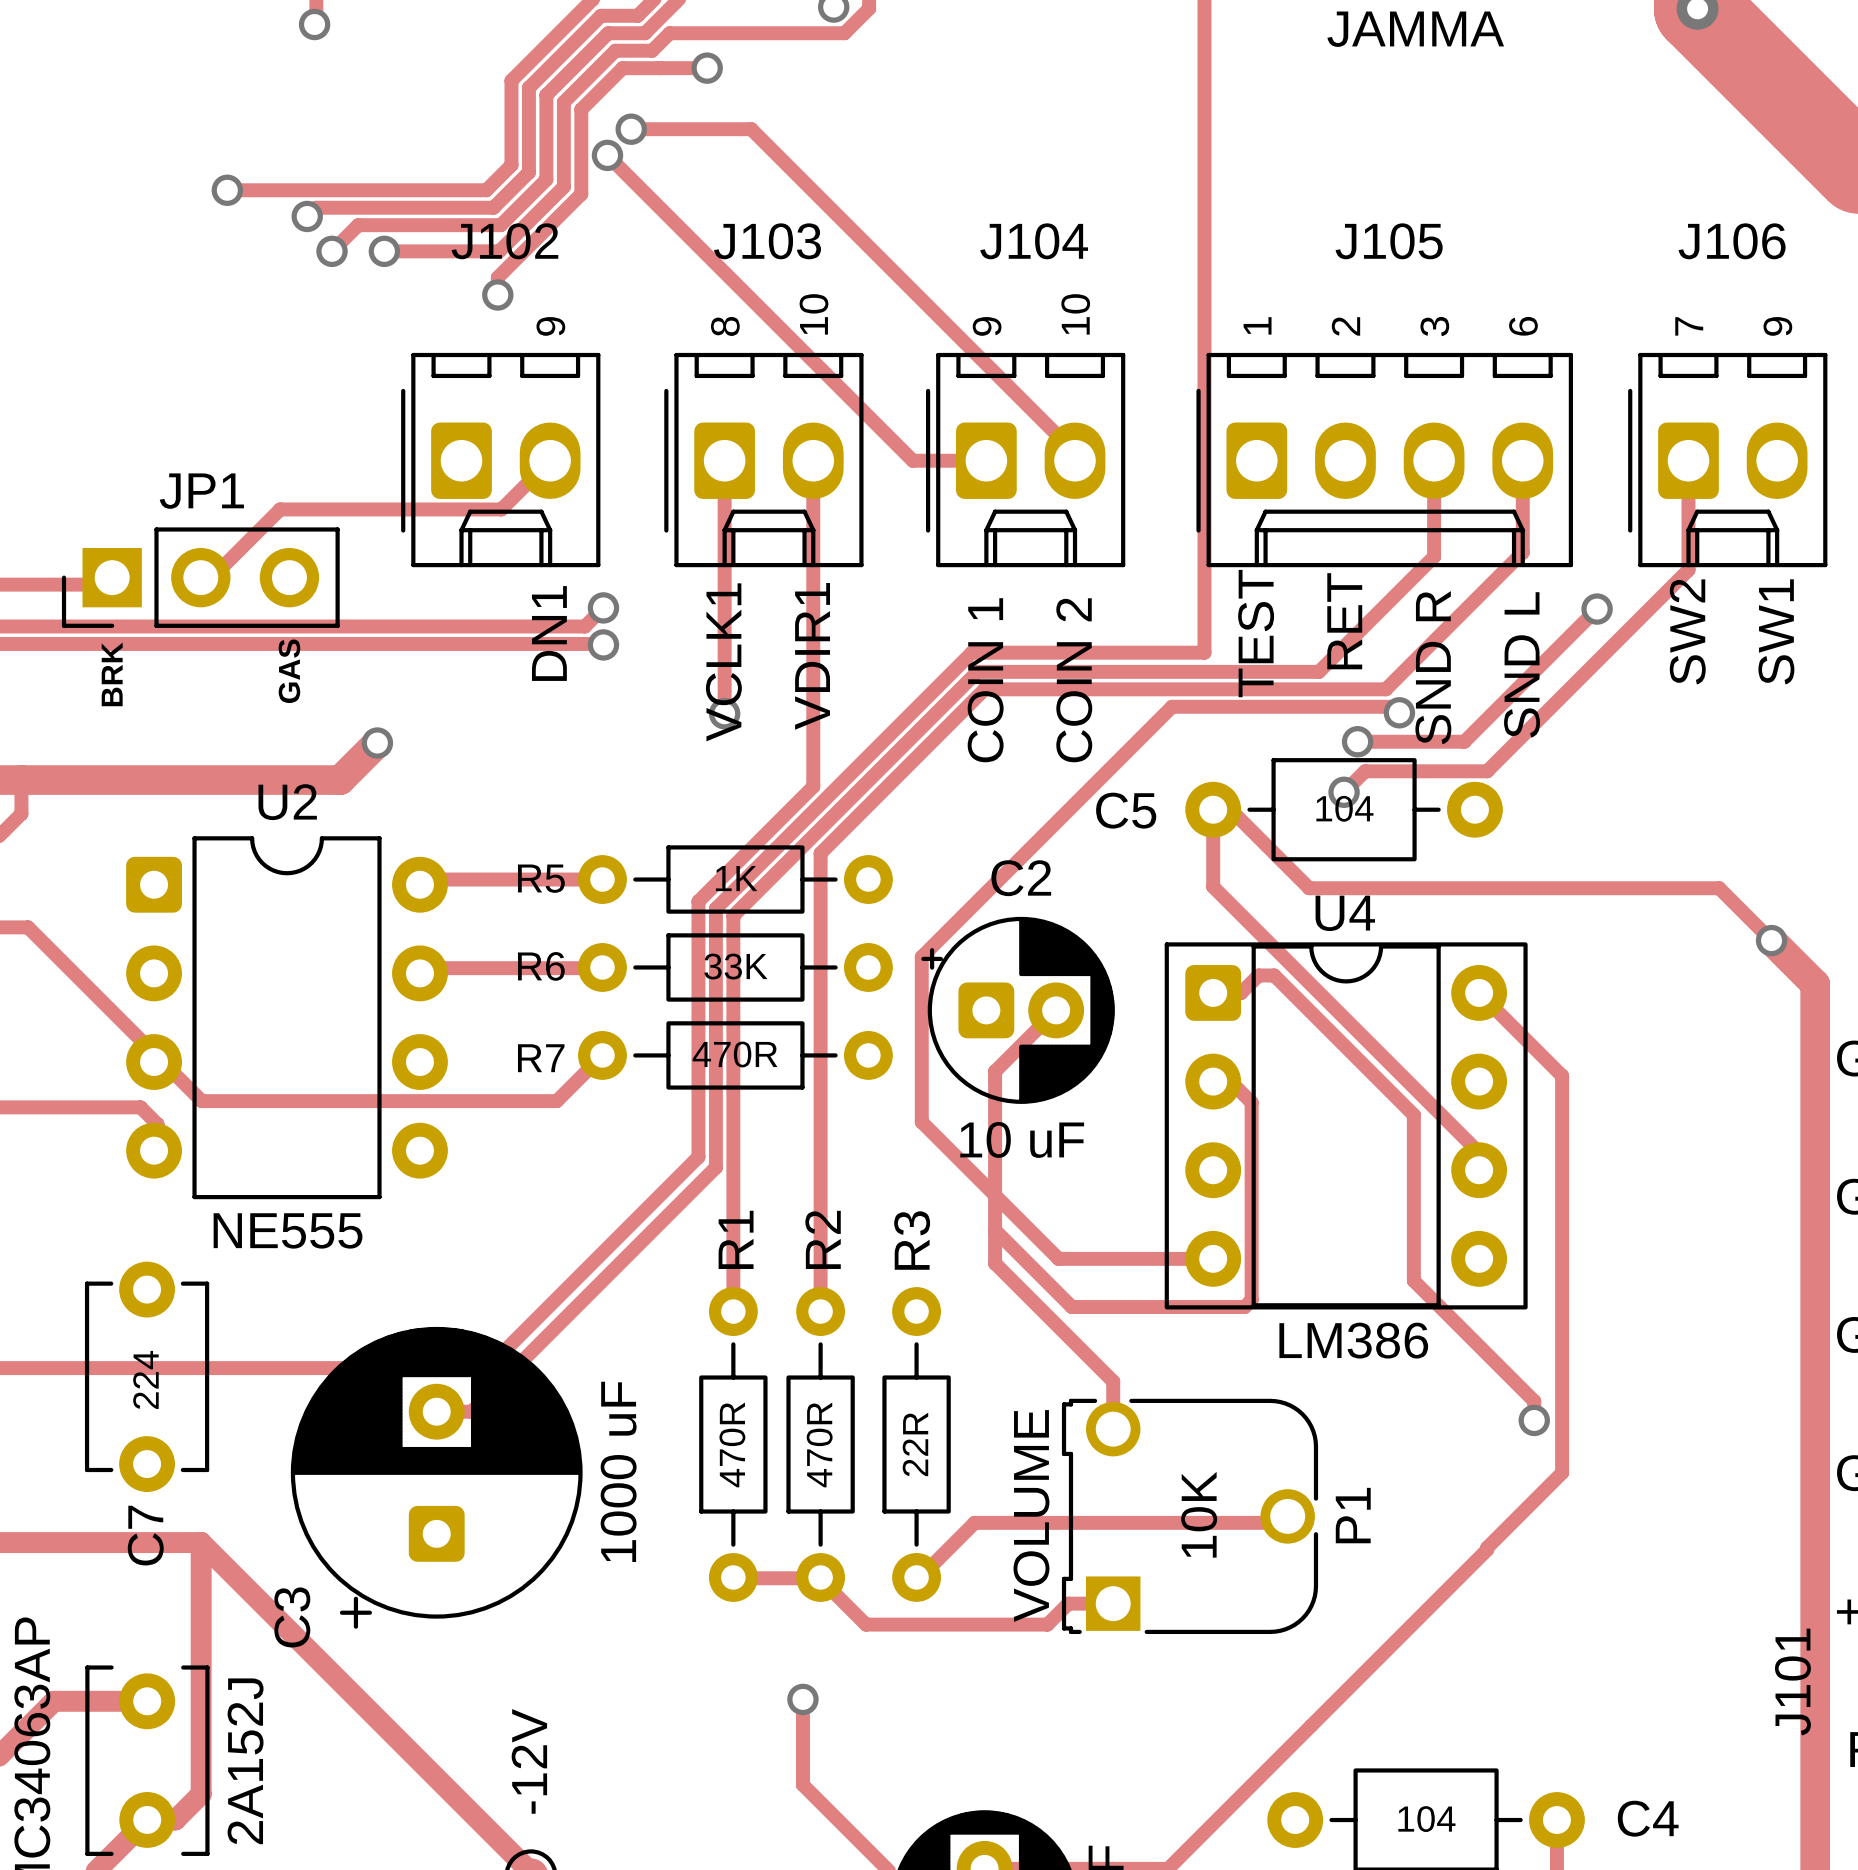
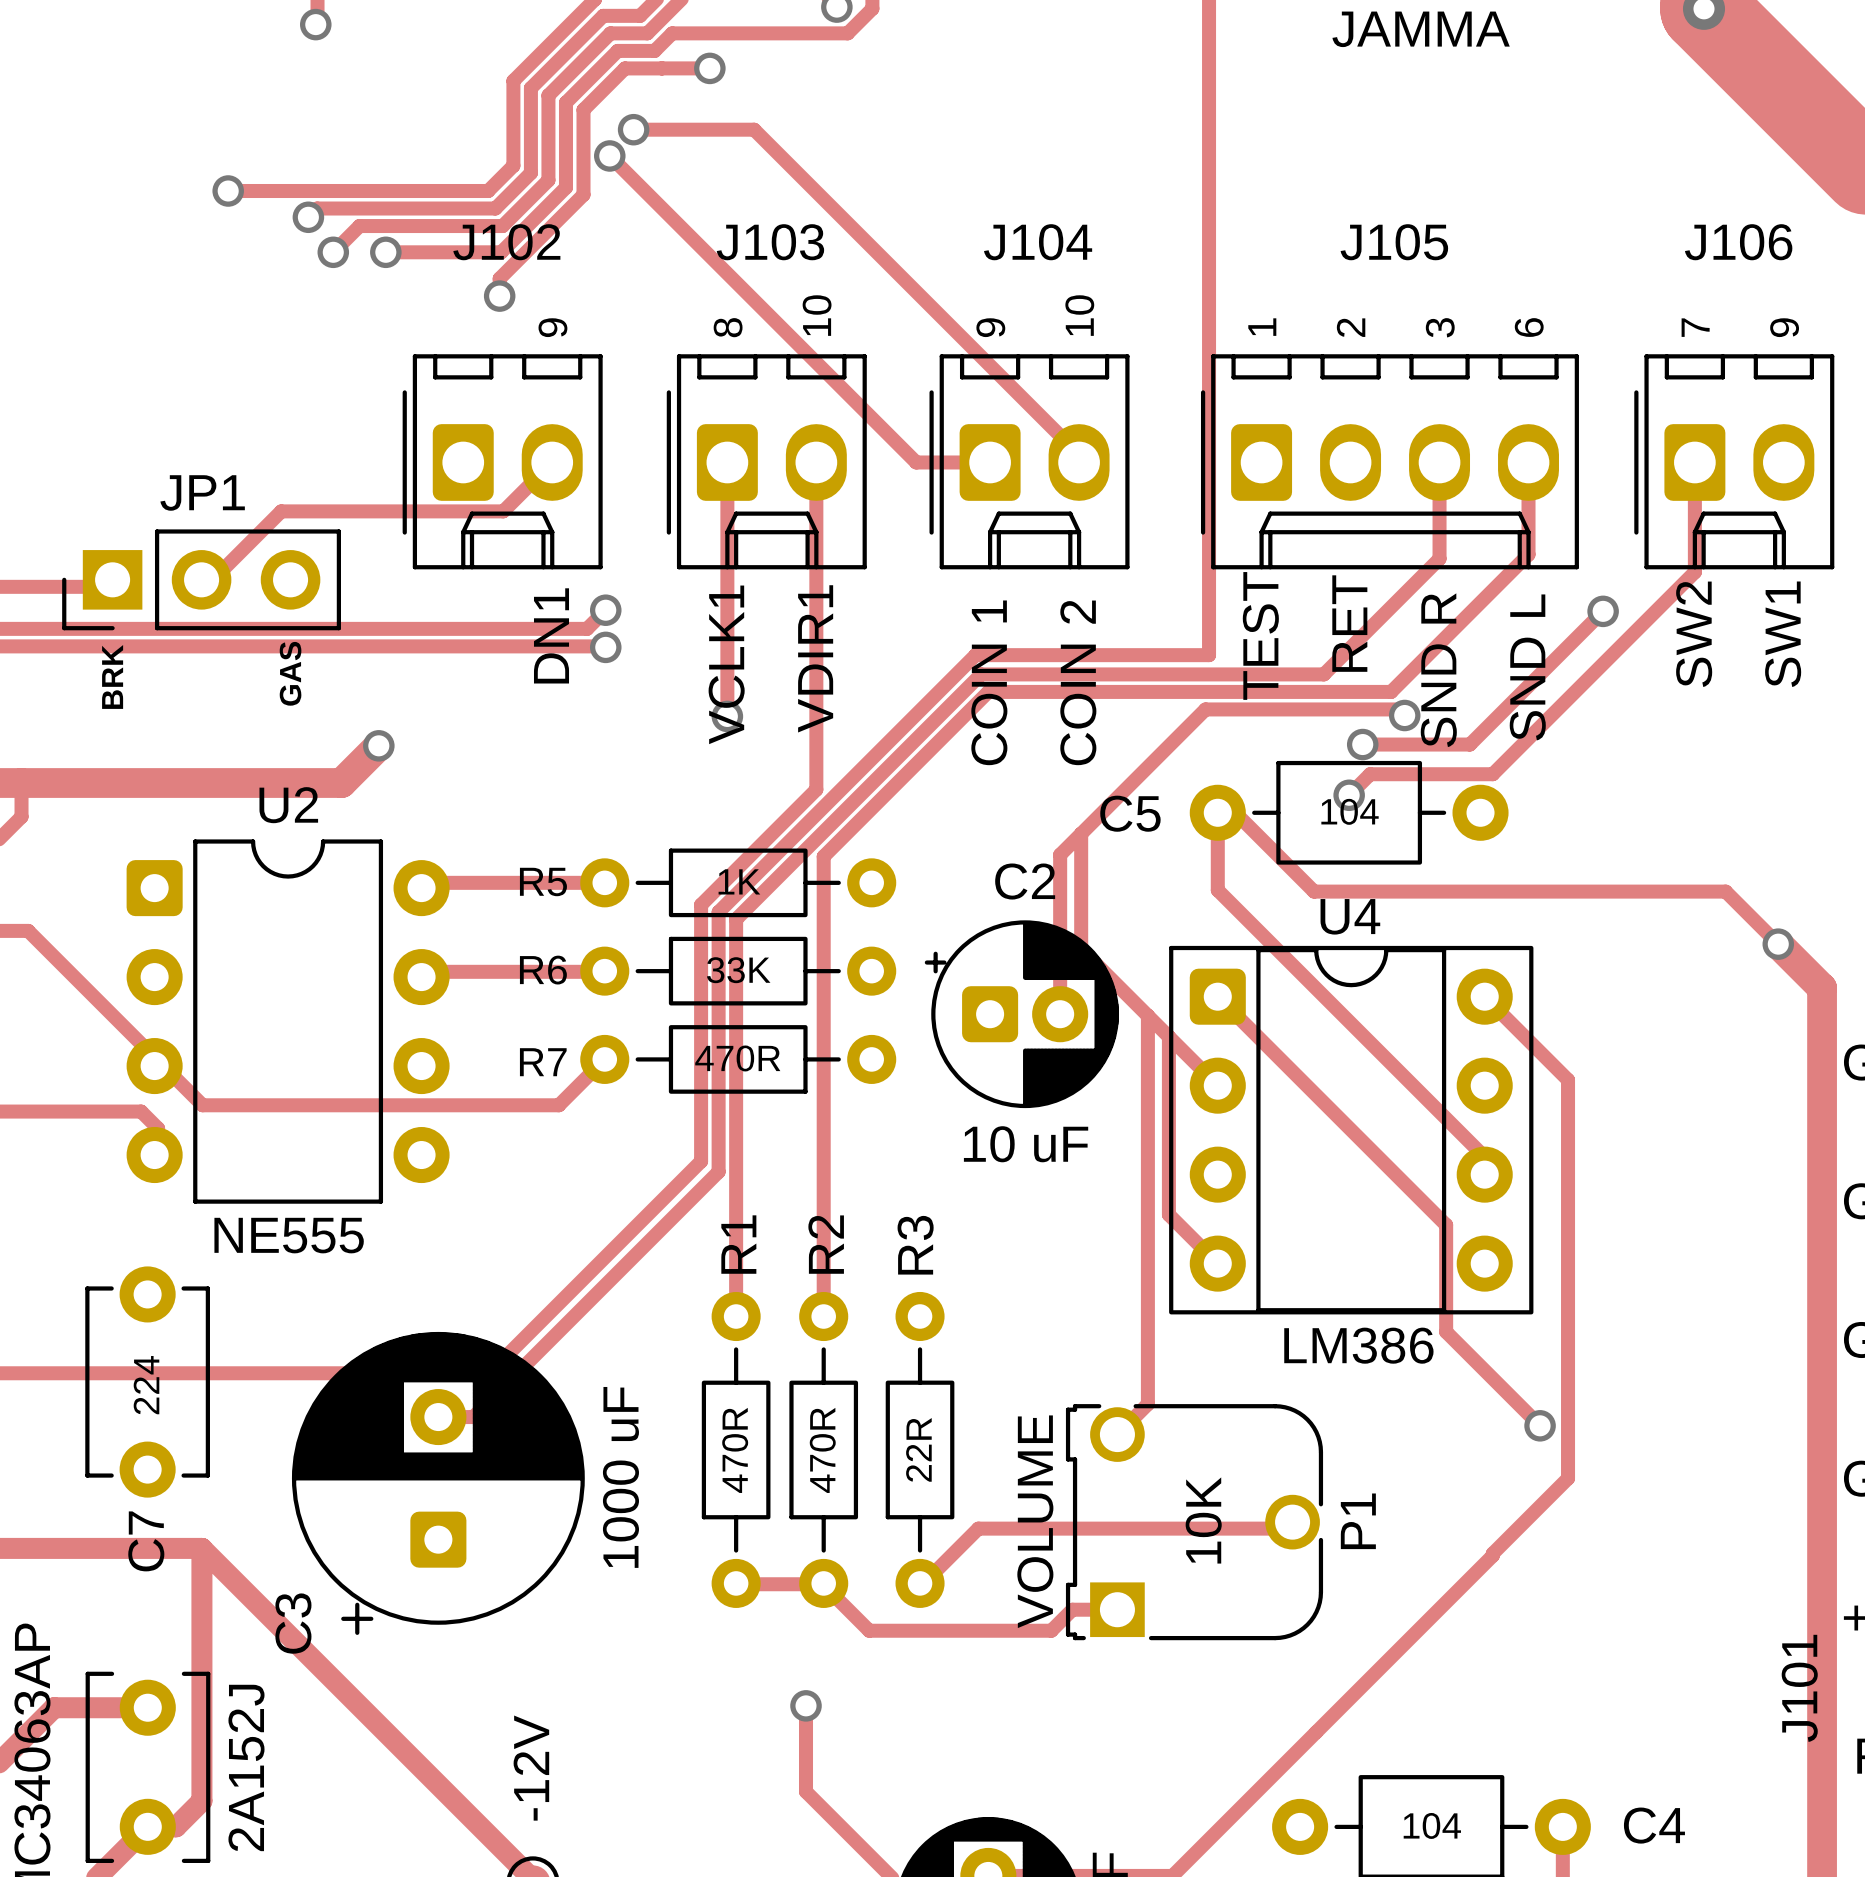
track: (1200, 706) (1172, 706) (921, 957) (921, 1122) (1058, 1258) (1213, 1258) -> (1205, 709) (1060, 854) (1060, 1014)
track: (1213, 992) (1241, 992) (1258, 975) (1274, 975) (1413, 1115) (1413, 1280) (1534, 1401) (1534, 1420) -> (1217, 996) (1446, 1225) (1446, 1331) (1540, 1425)
track: (1056, 1010) (995, 1071) (995, 1263) (1113, 1381) (1113, 1429) -> (1147, 1015) (1147, 1404) (1117, 1434)
track: none -> (1168, 1036) (1168, 1214) (1217, 1263)
track: (1213, 1081) (1230, 1081) (1251, 1102) (1251, 1300) (1244, 1307) (1071, 1307) (995, 1230) -> (1217, 1085) (1081, 949) (1081, 833)

